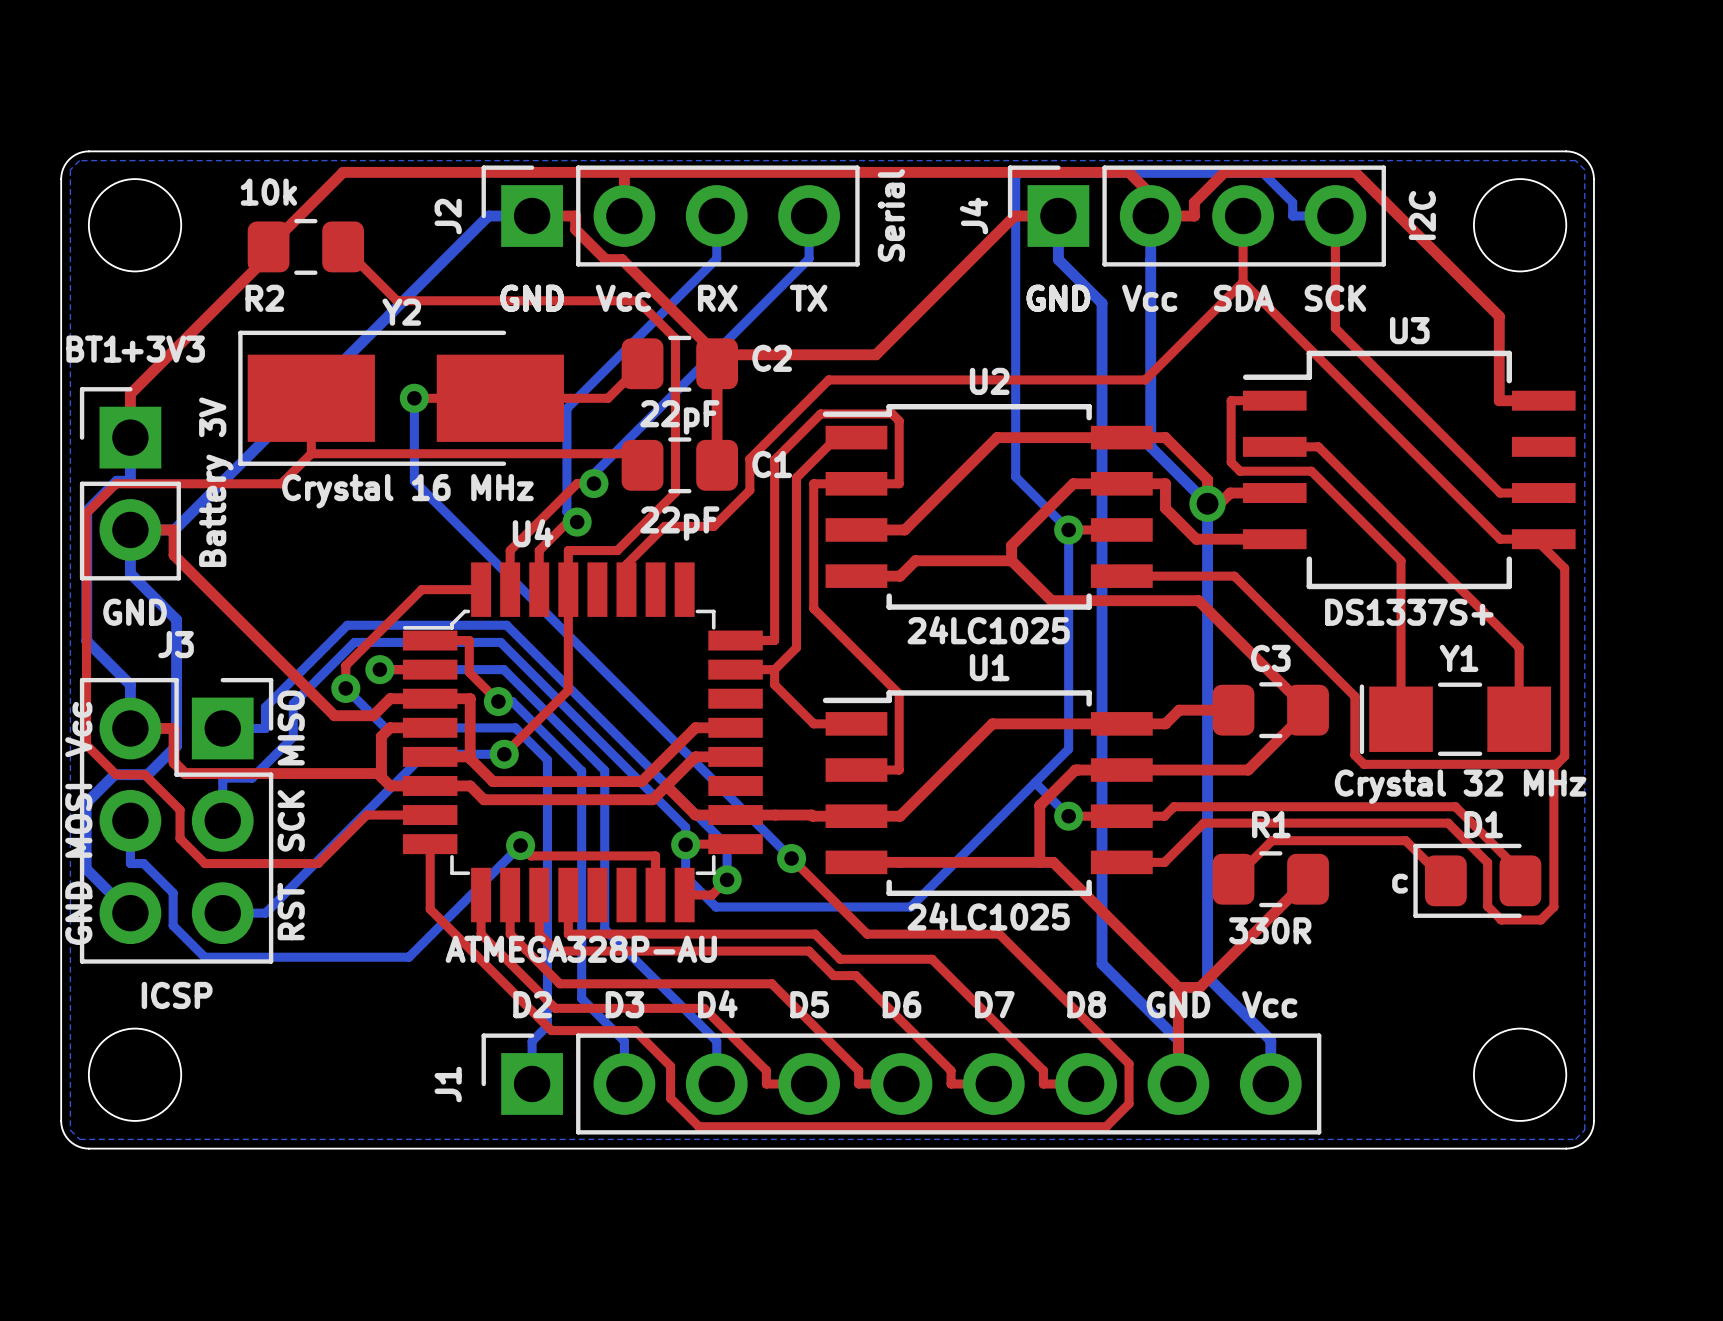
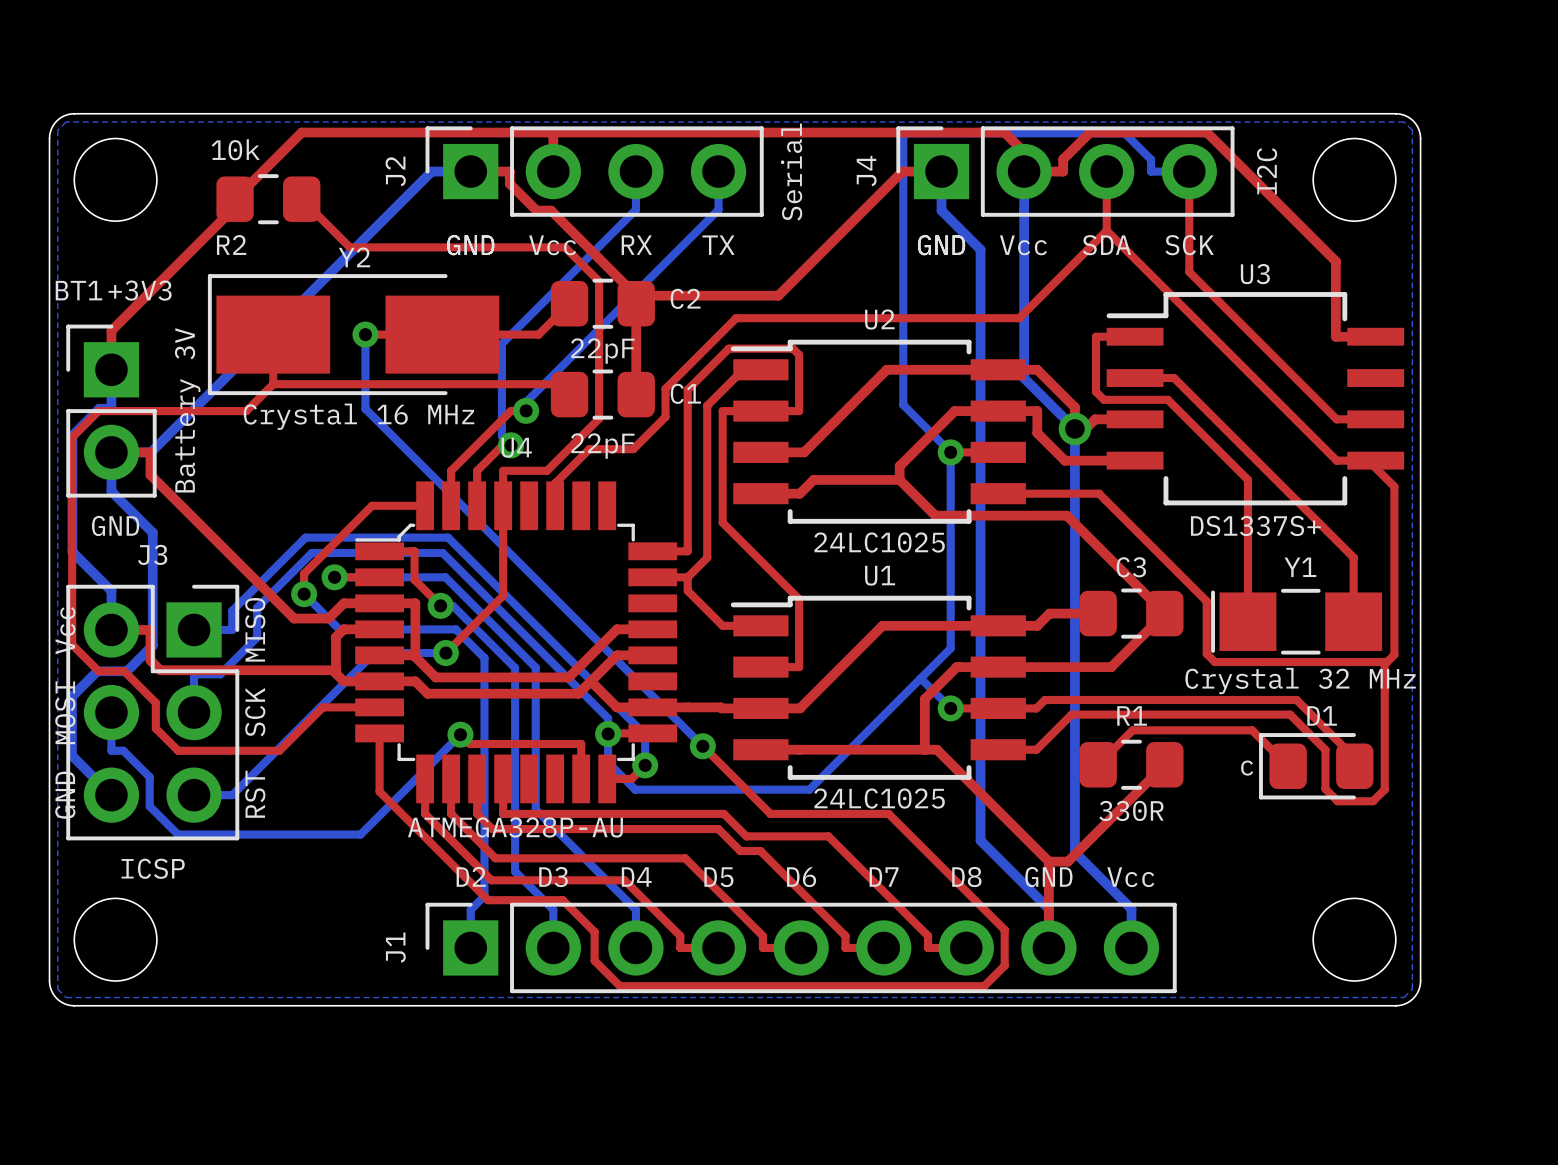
U4 name position: U4 (533, 533) -> U4 (516, 447)

